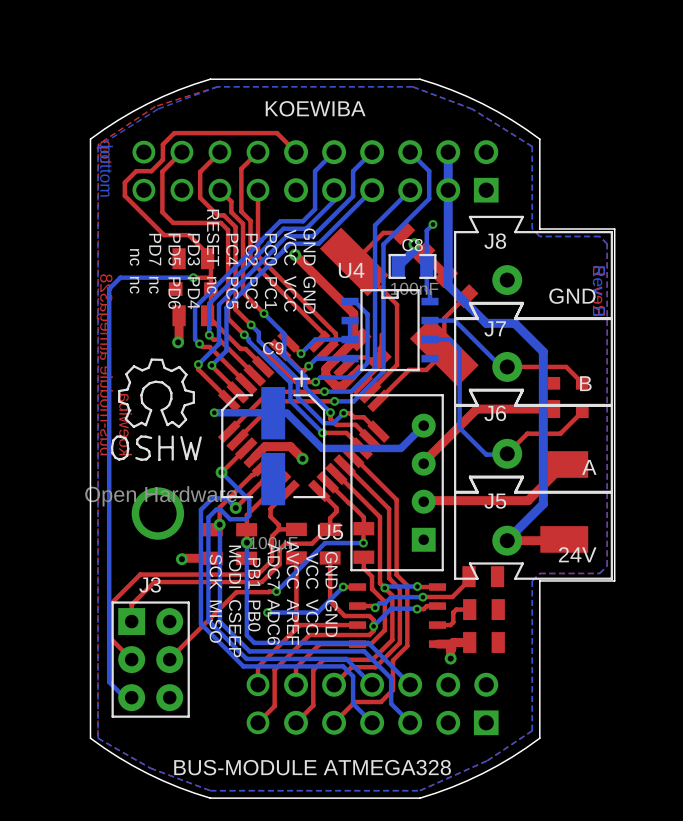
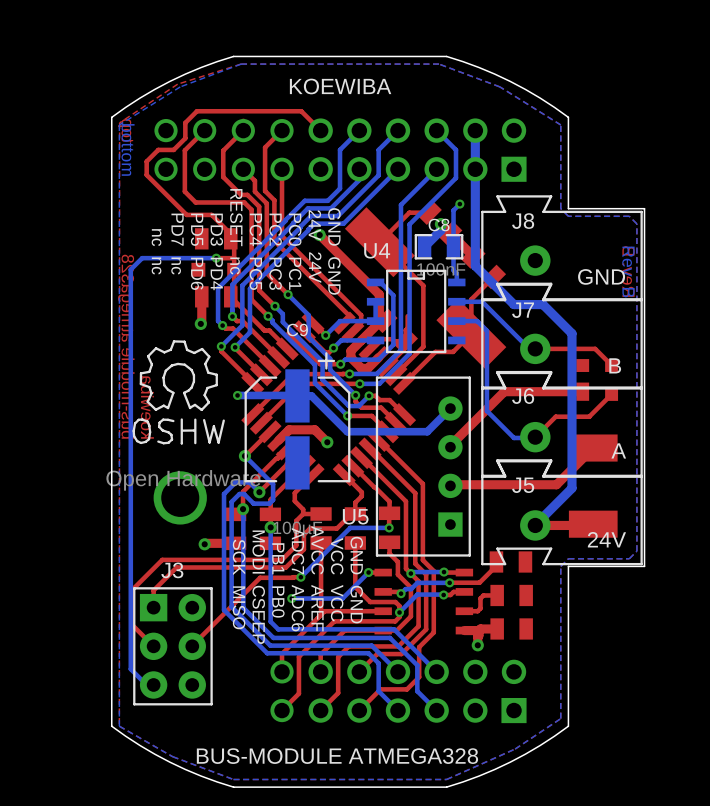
text: none -> 24V (314, 225)
text: VCC (290, 247) -> none
text: none -> 24V (315, 267)
text: VCC (290, 293) -> none

